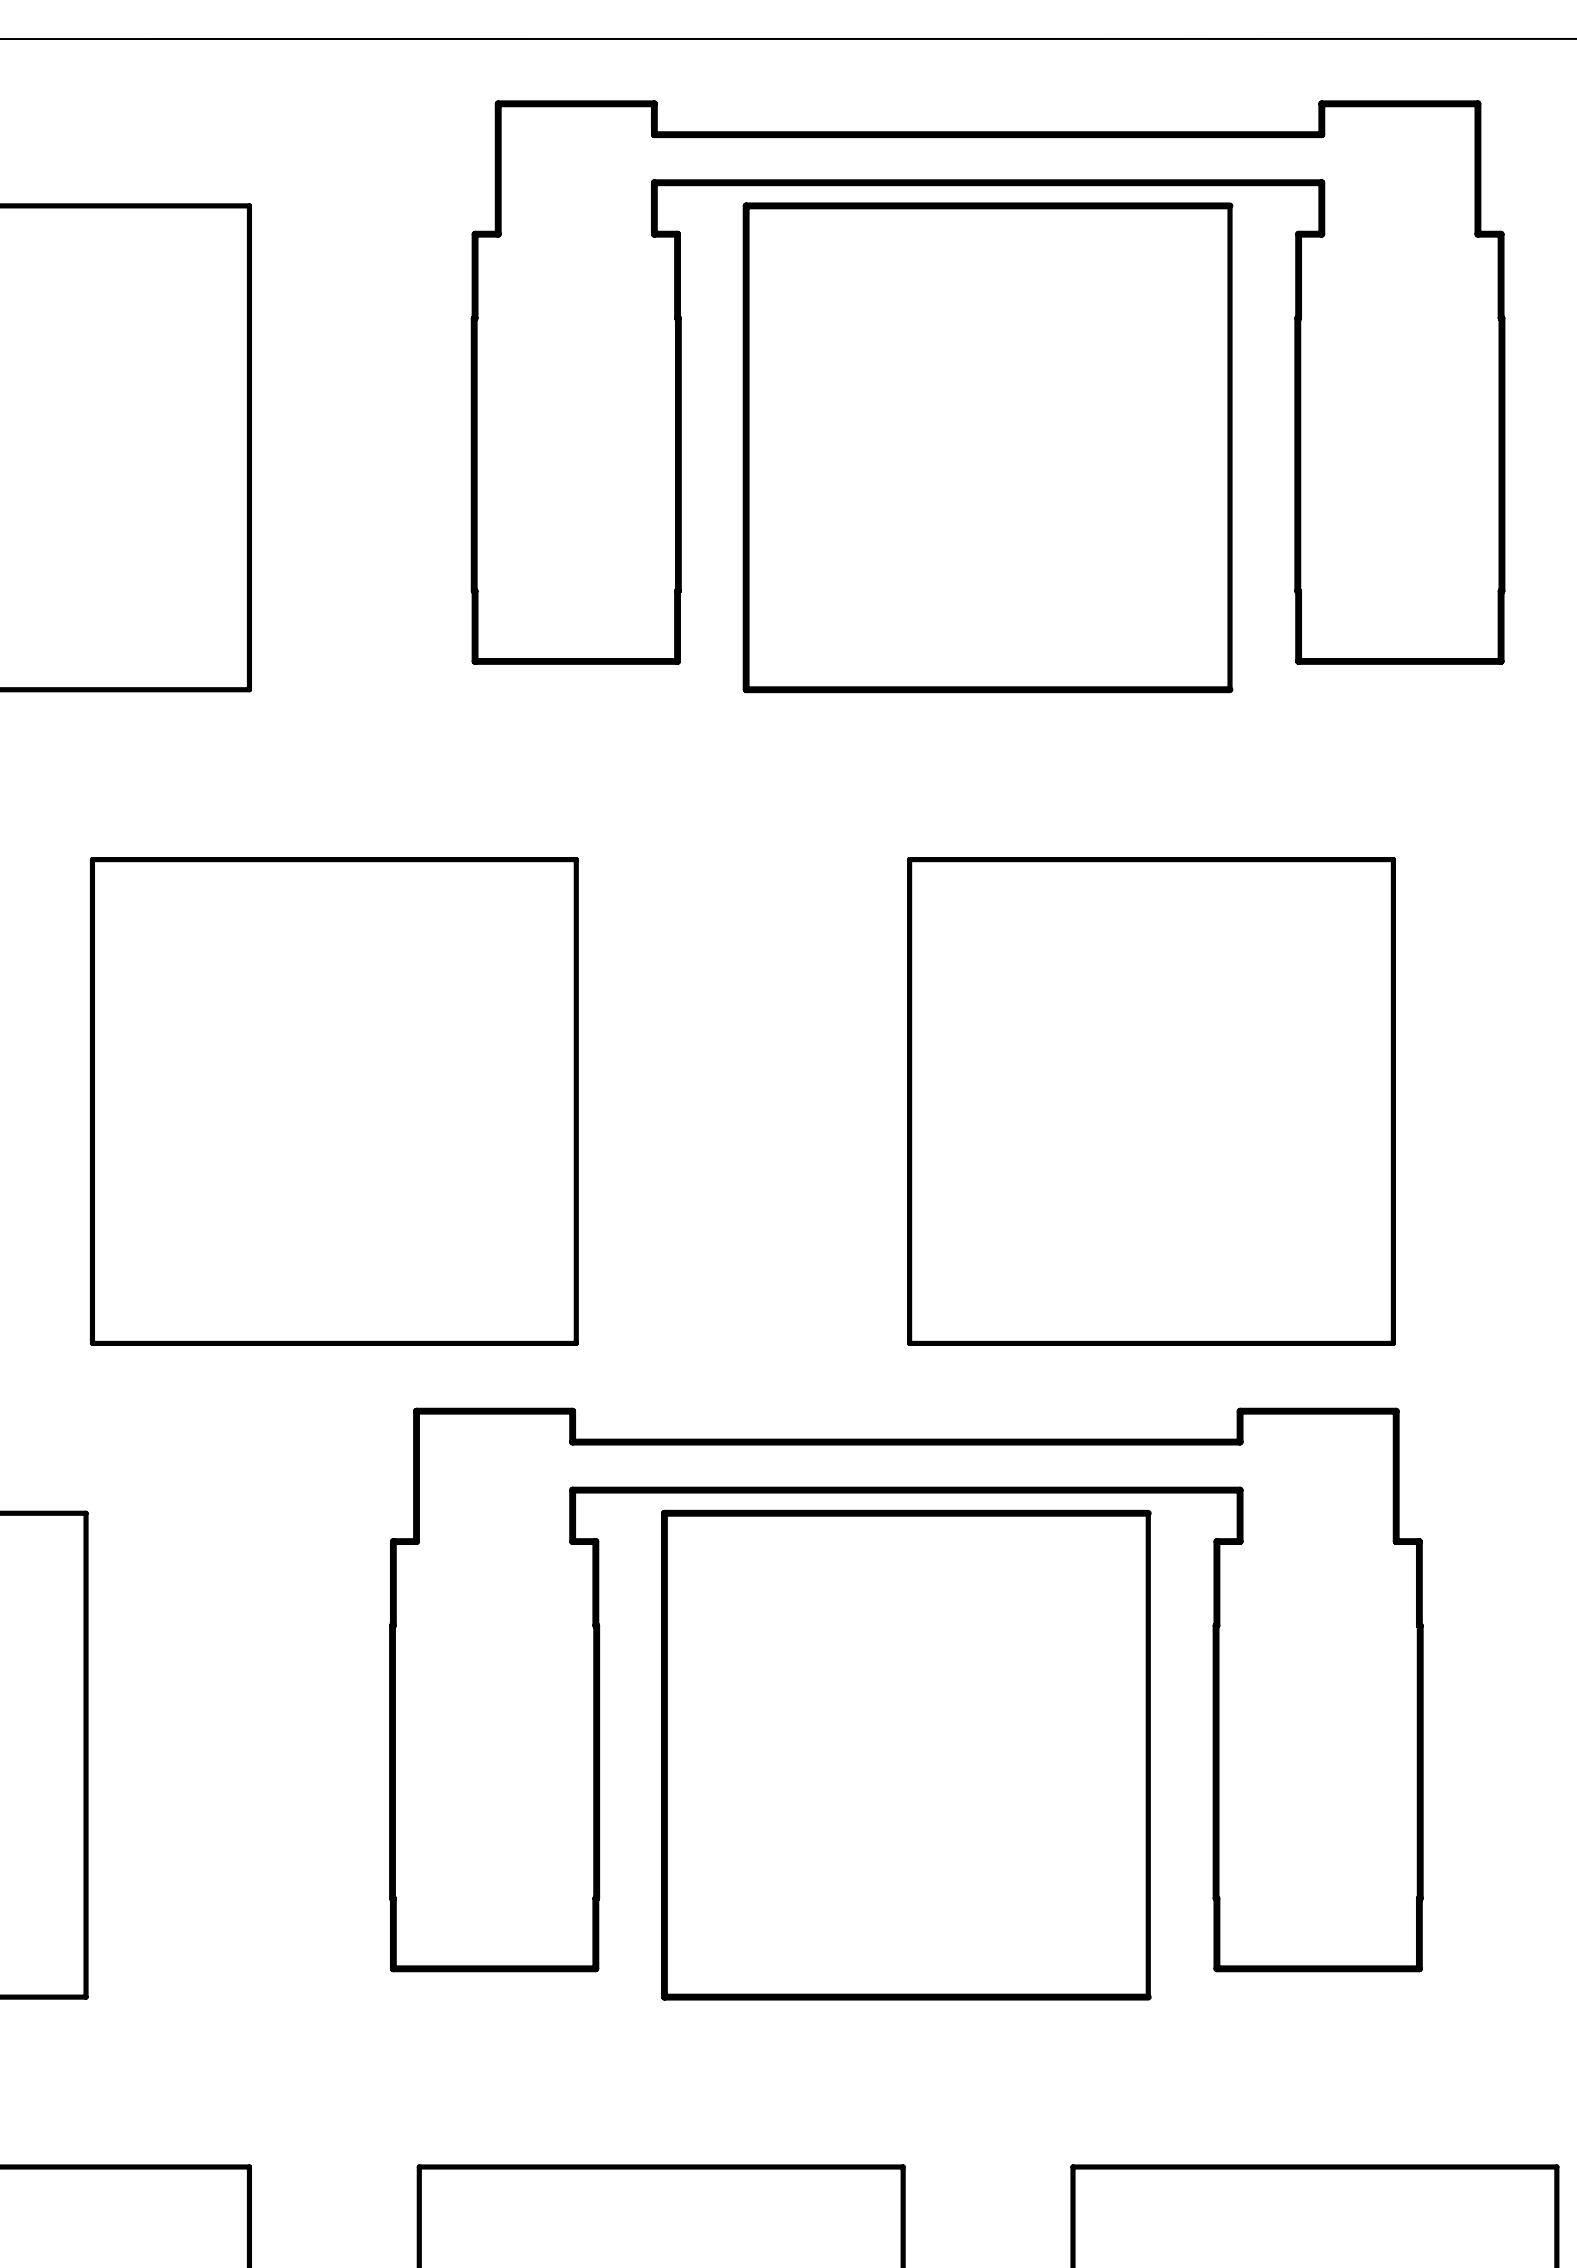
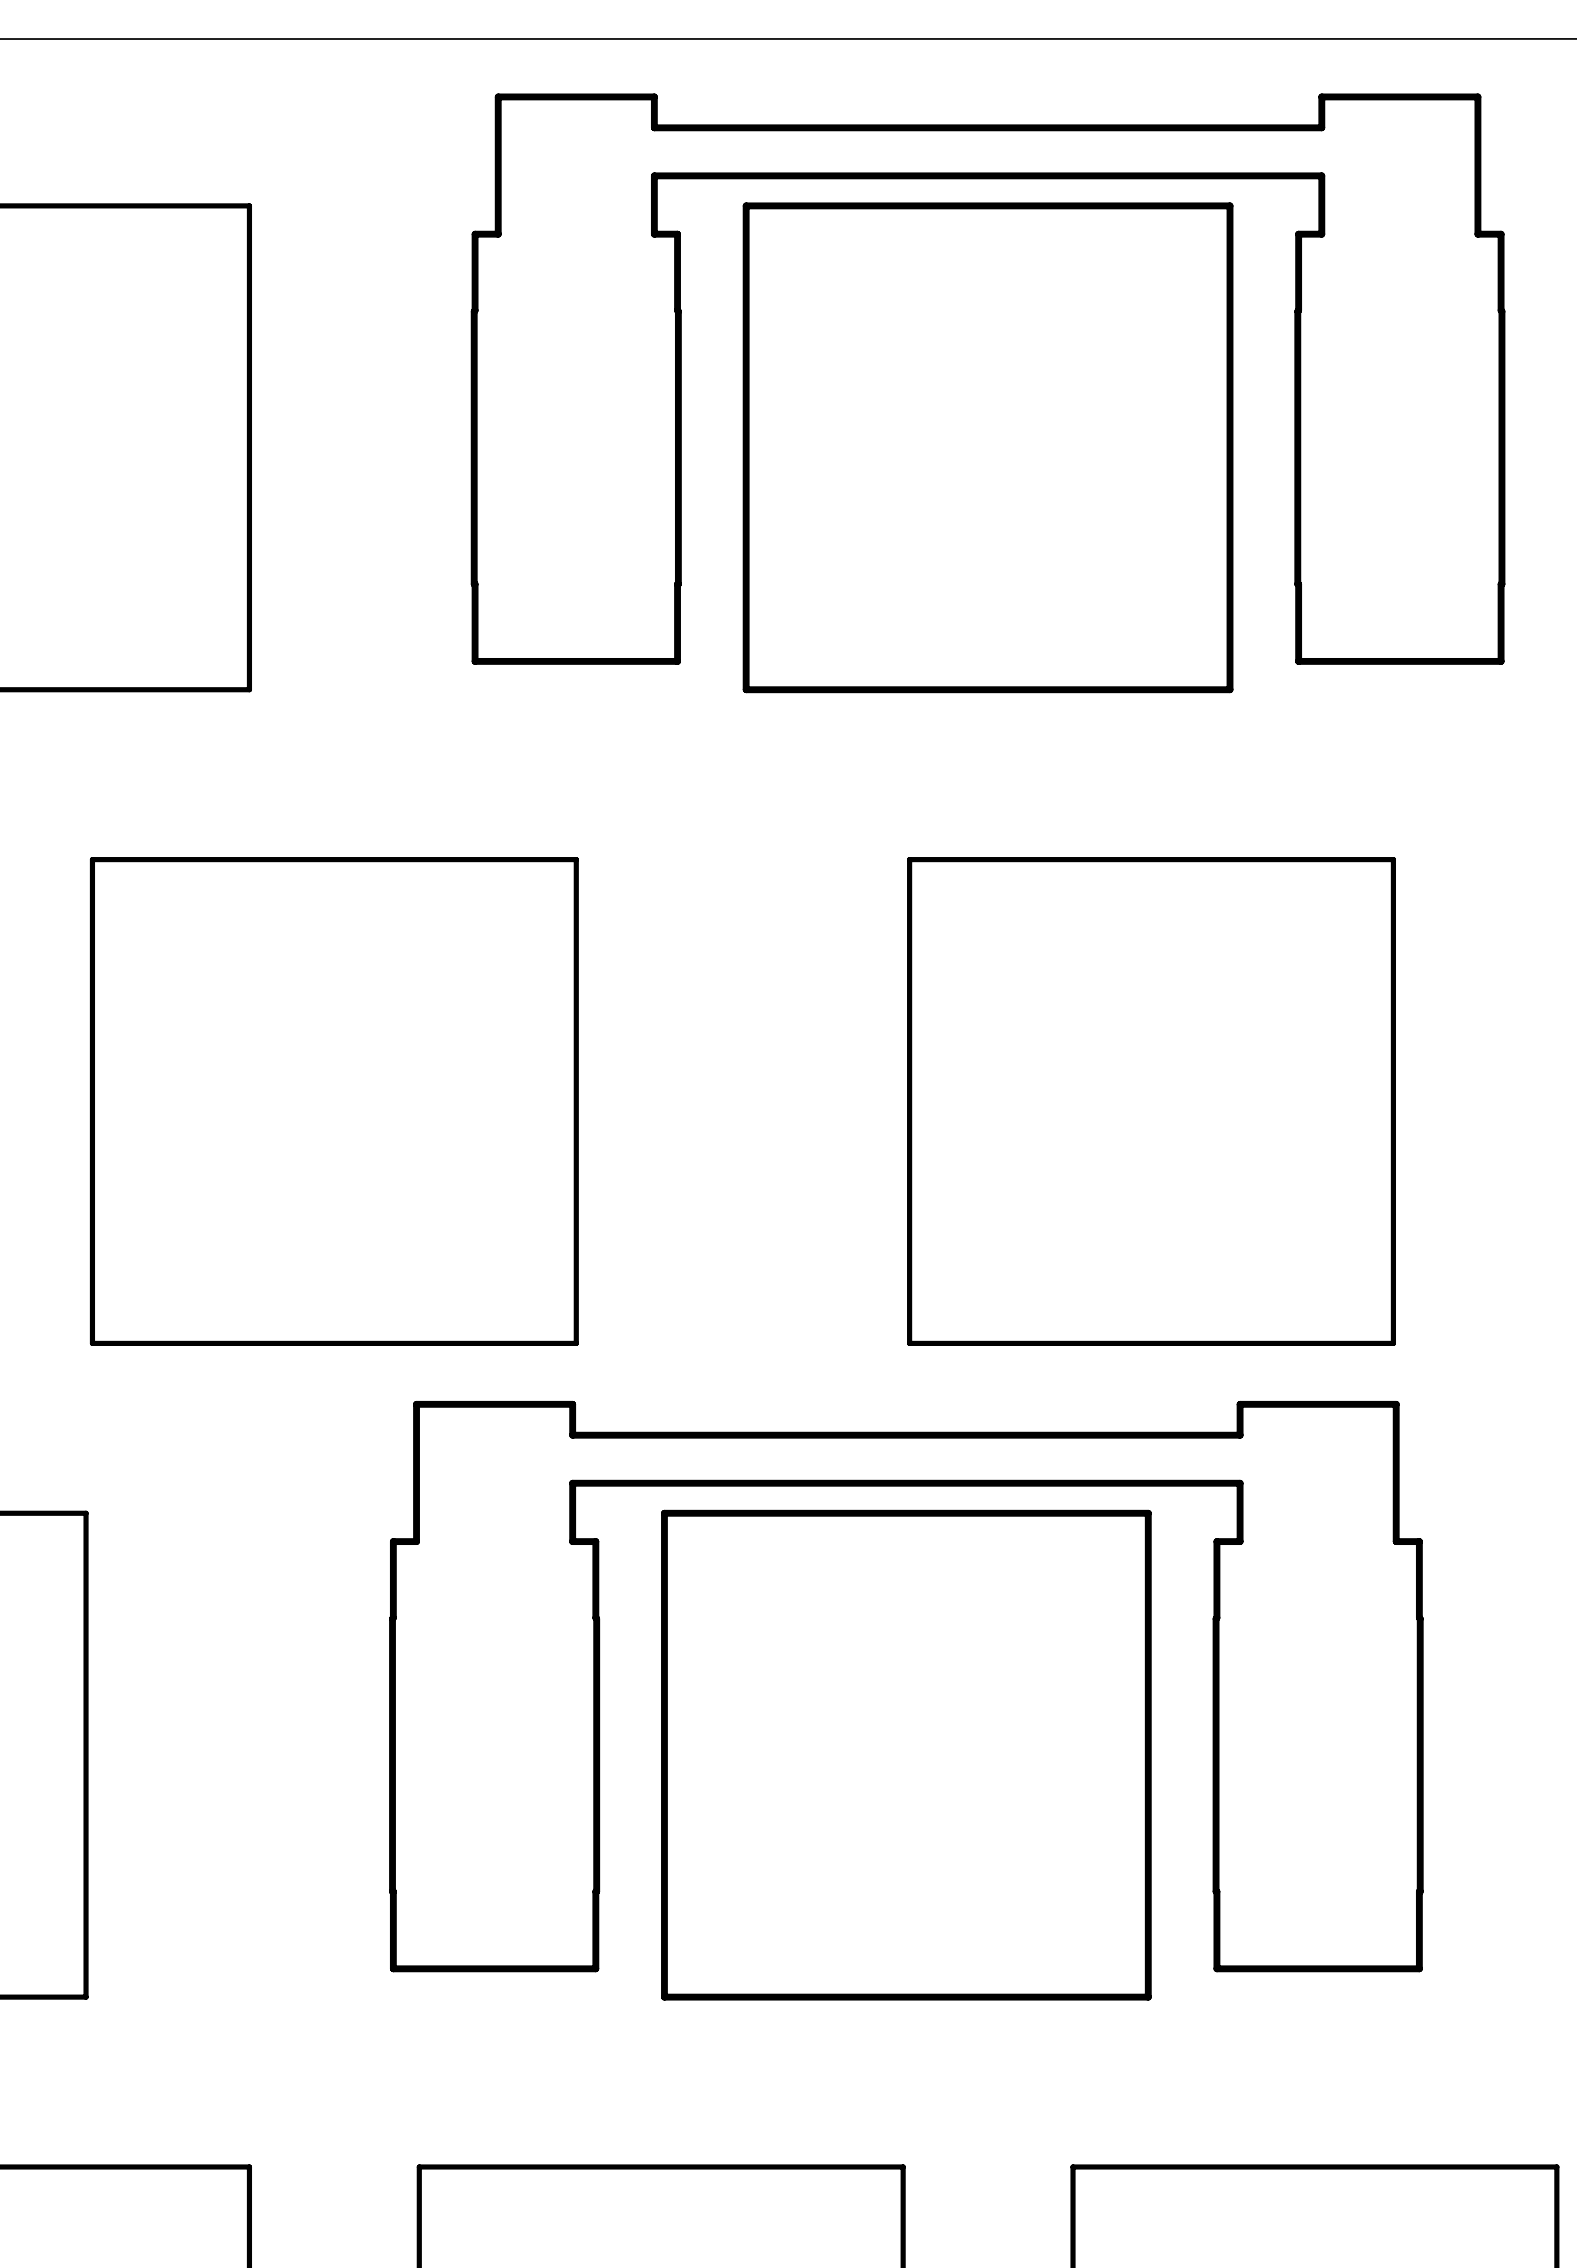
drawing shape: [470, 100, 1506, 694] -> [470, 93, 1506, 694]
drawing shape: [389, 1407, 1424, 2001] -> [389, 1400, 1424, 2001]

